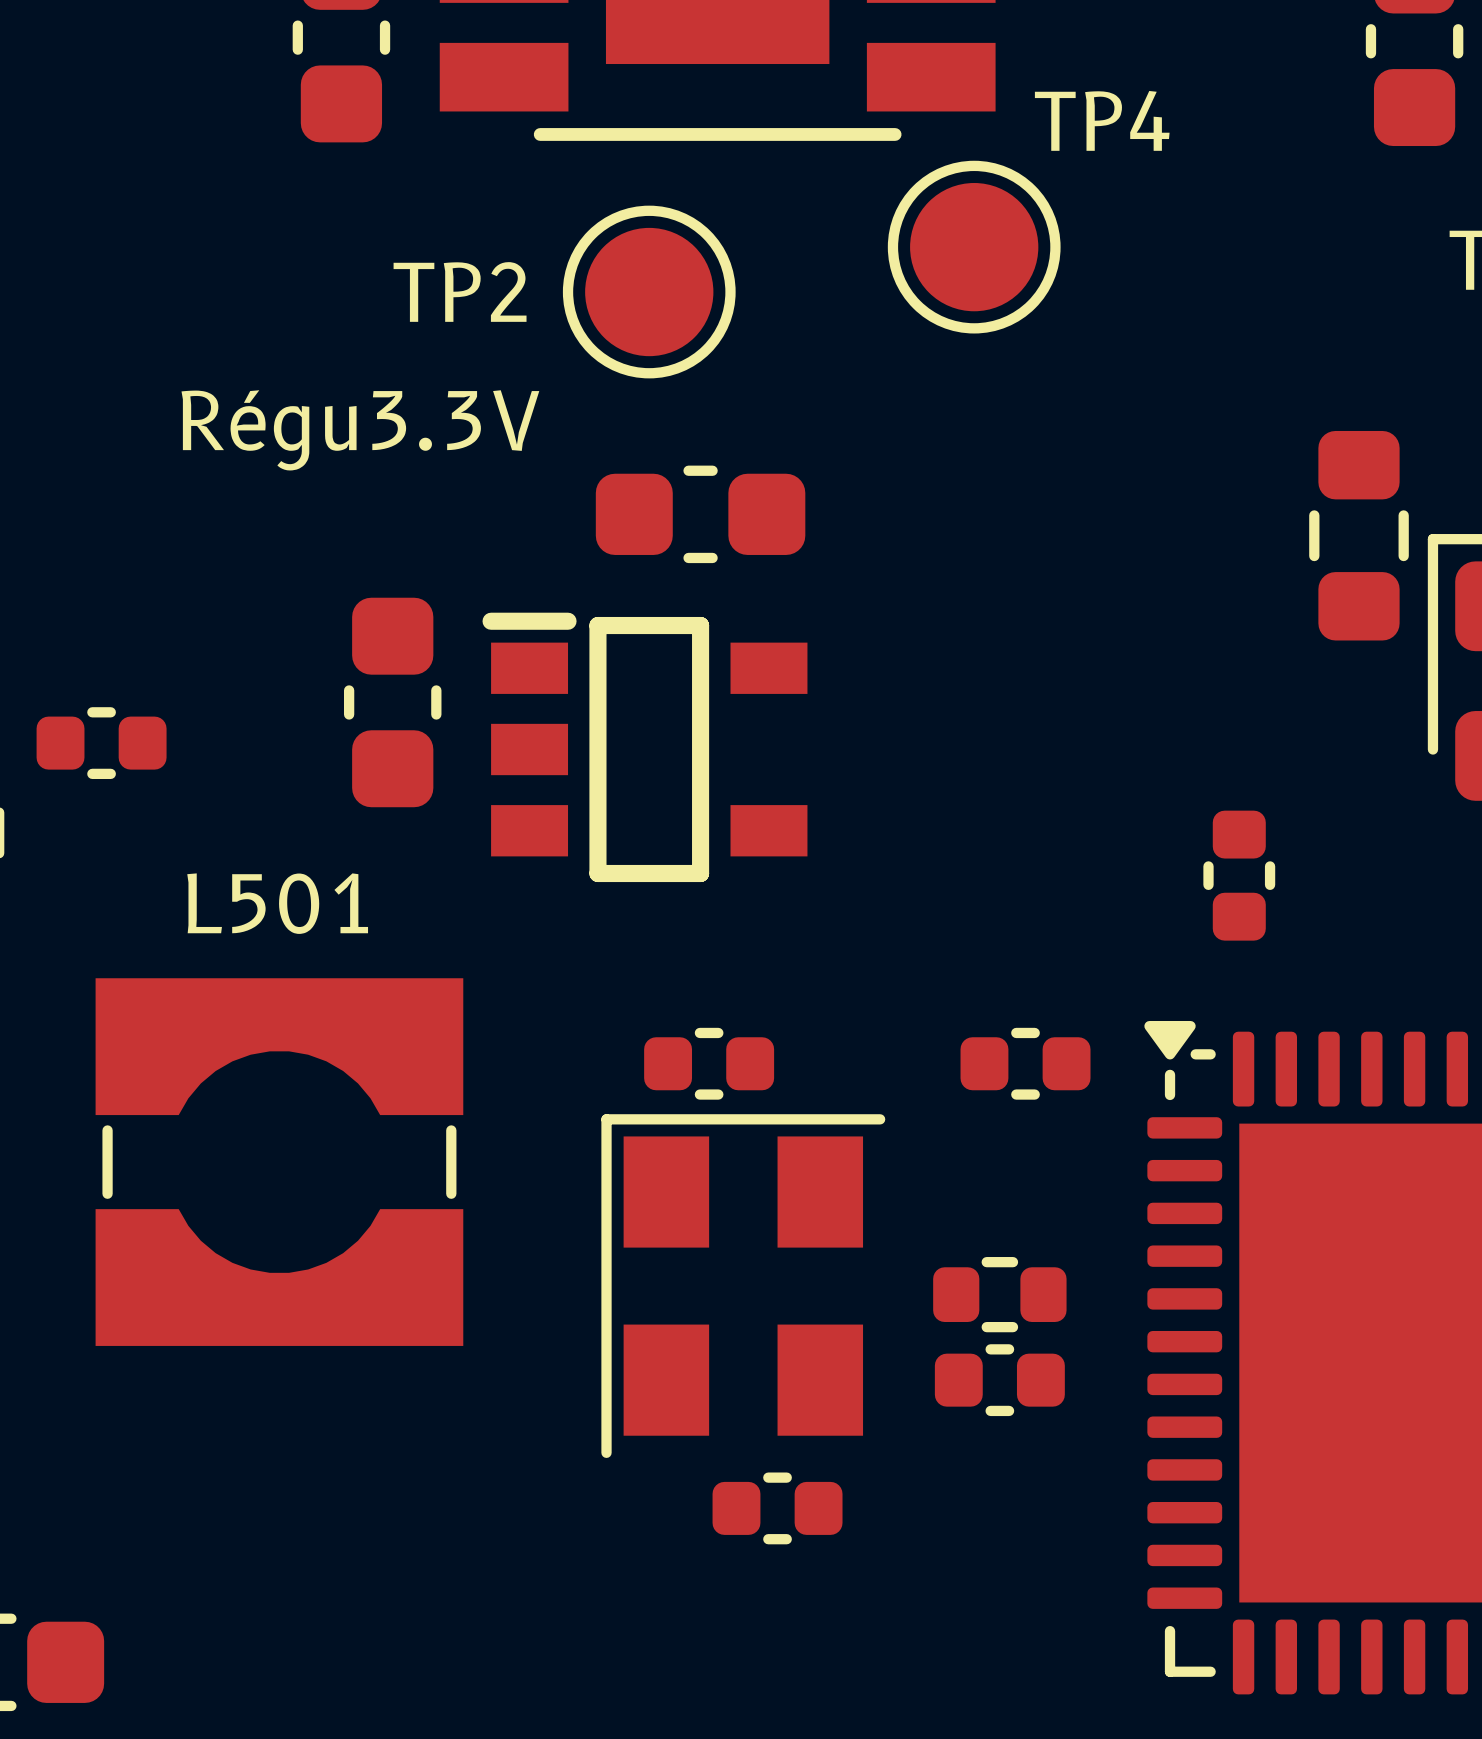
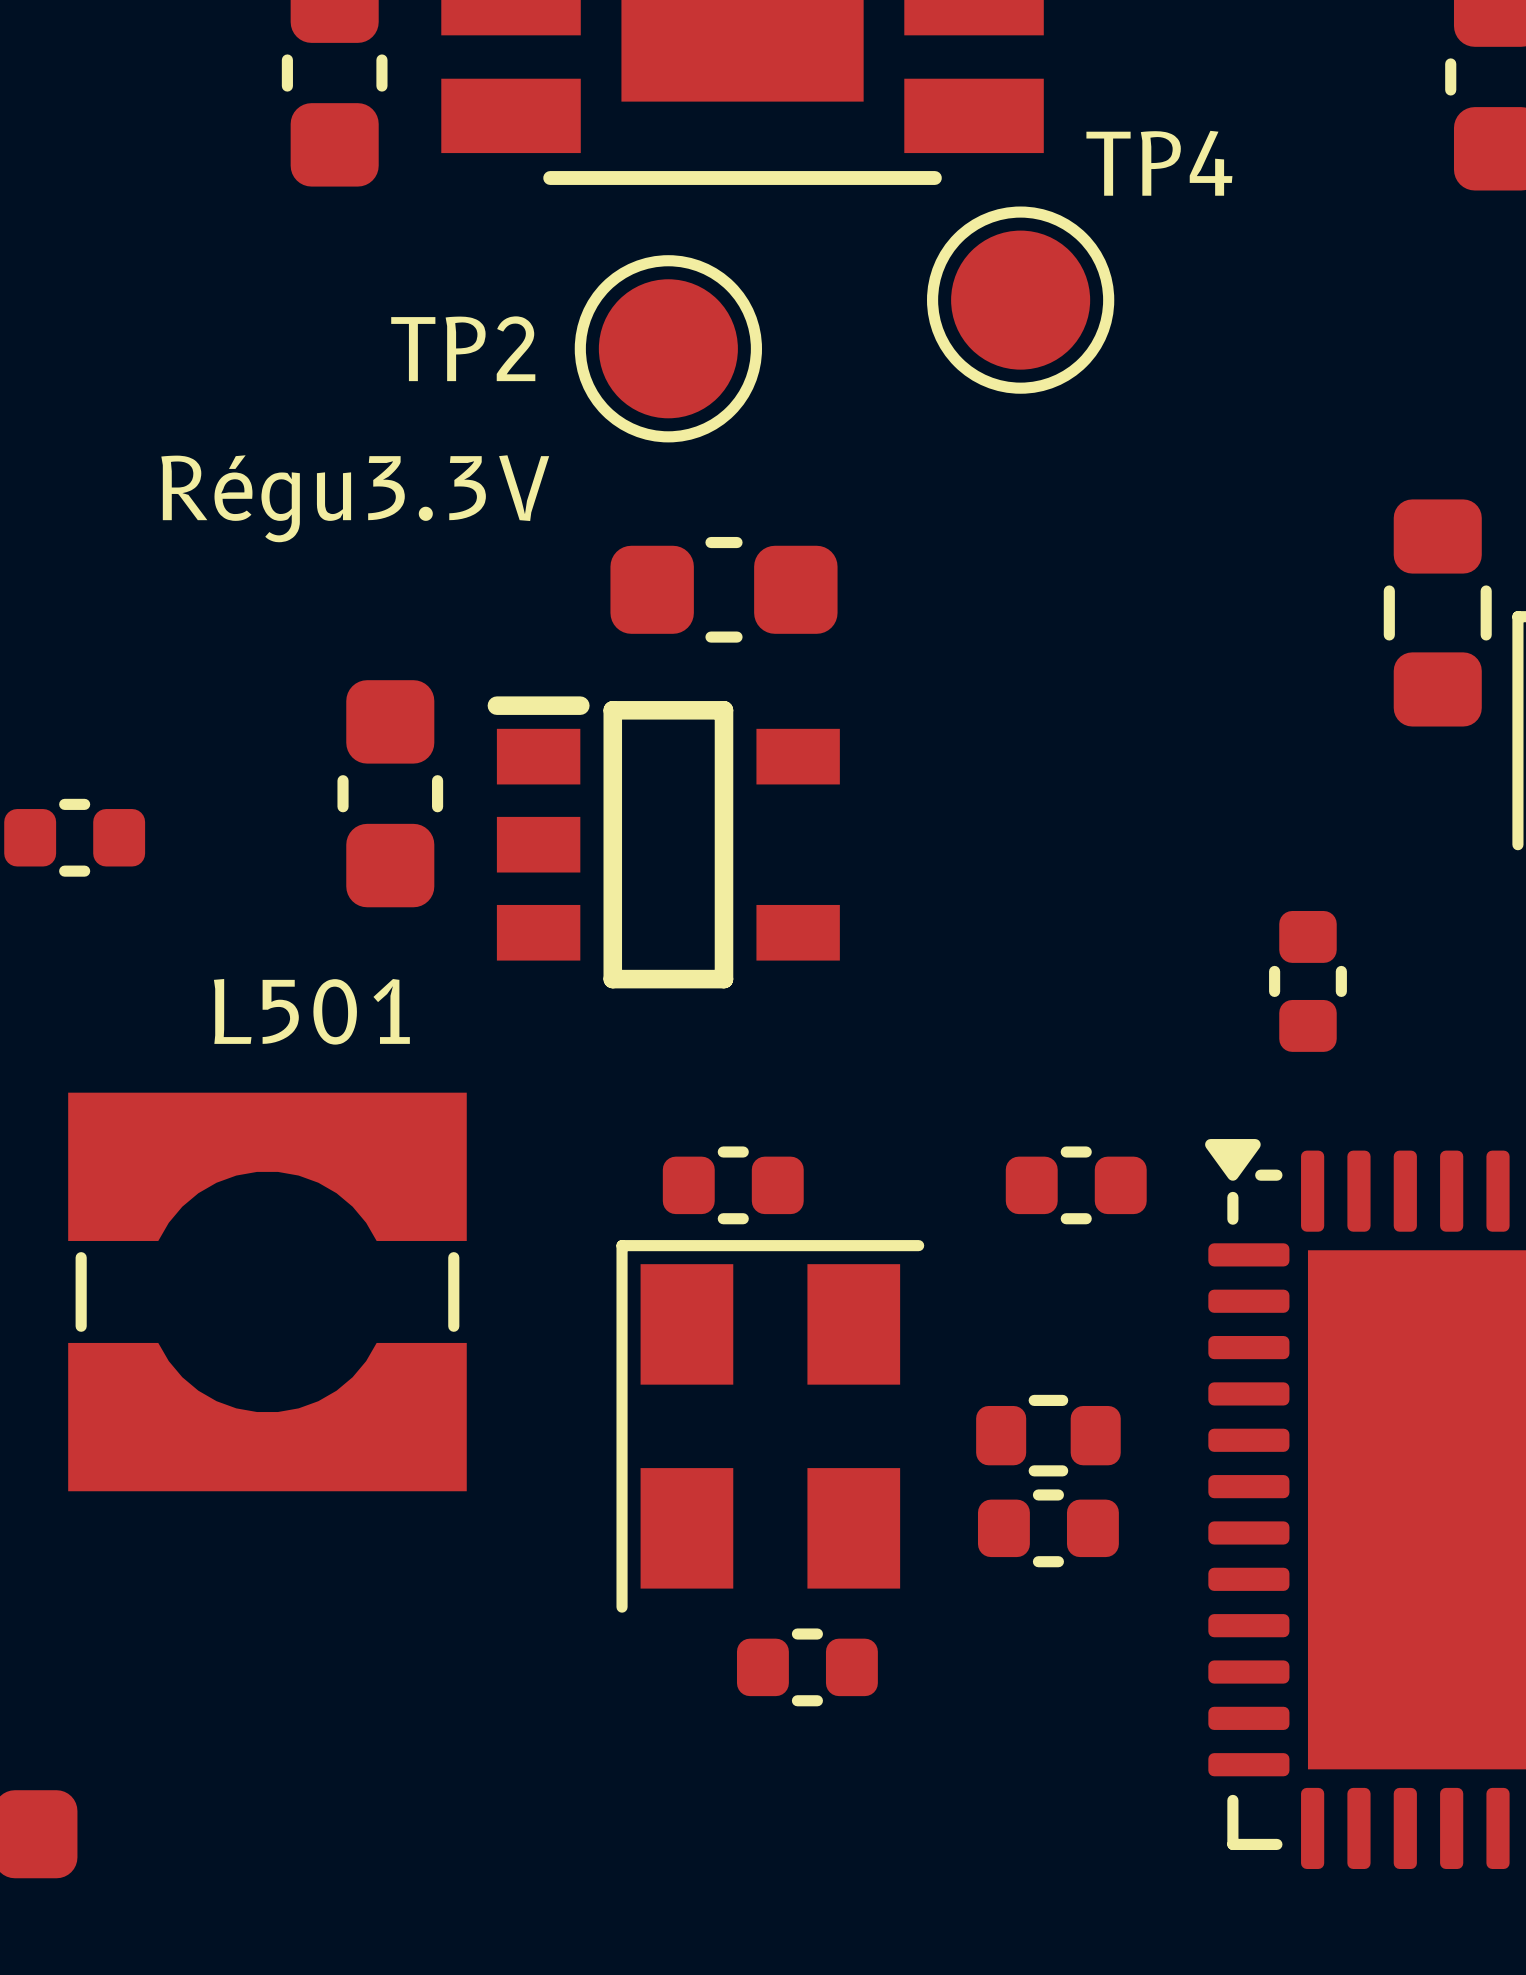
L501 name position: L501 (277, 903) -> L501 (311, 1011)

